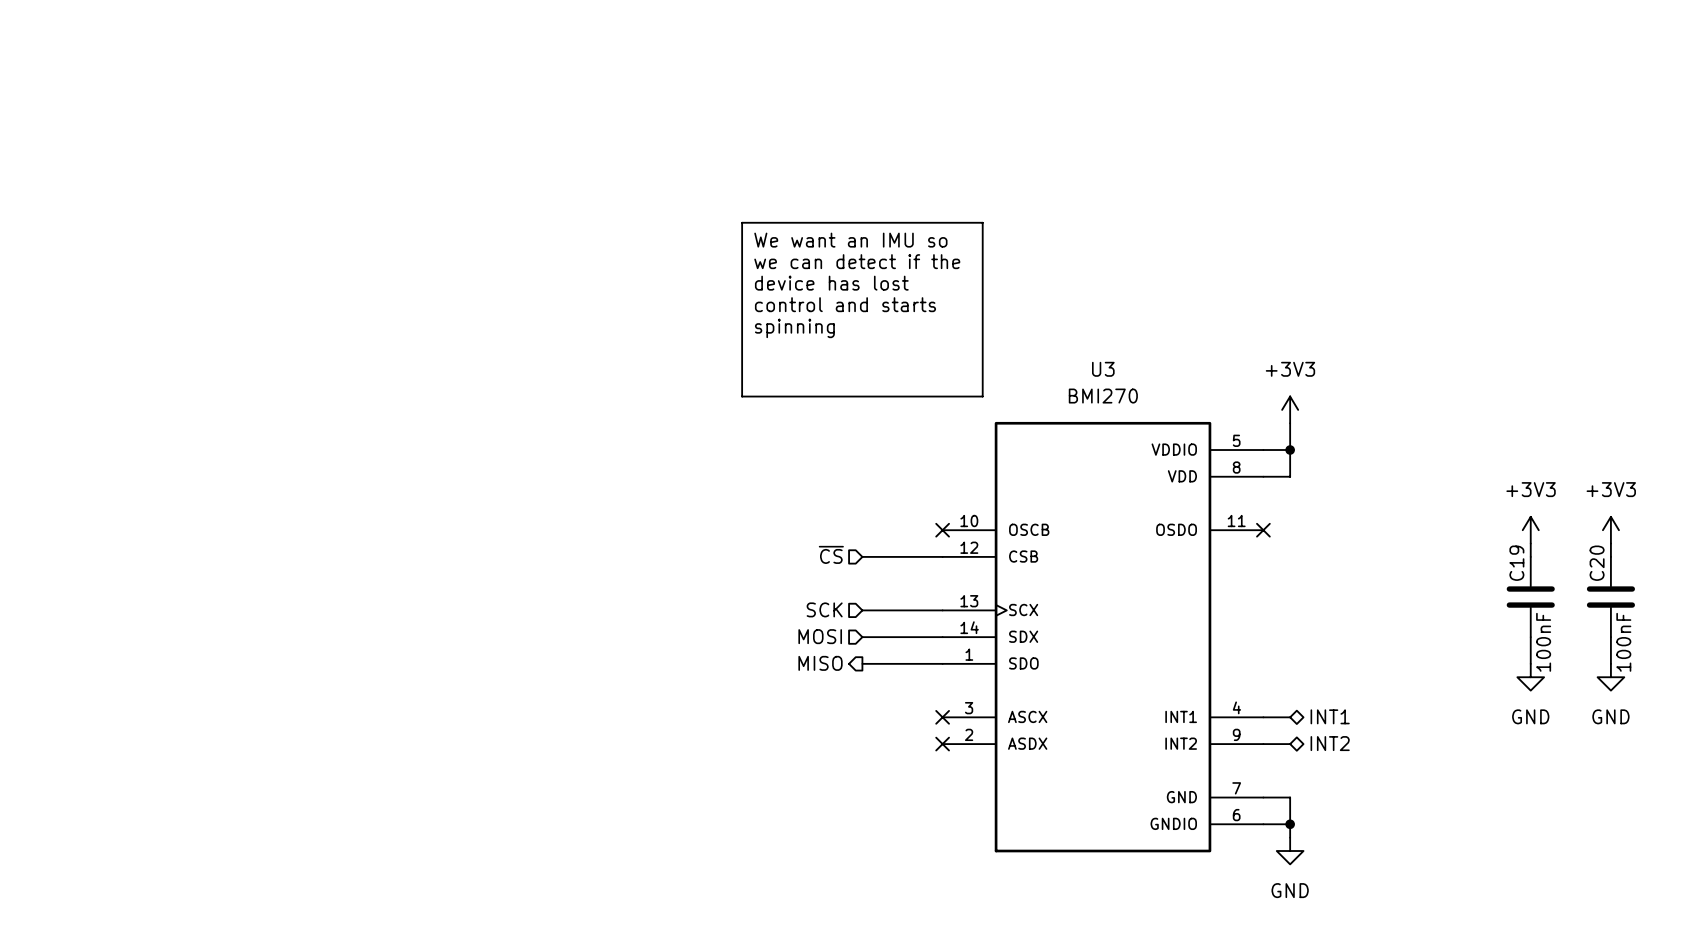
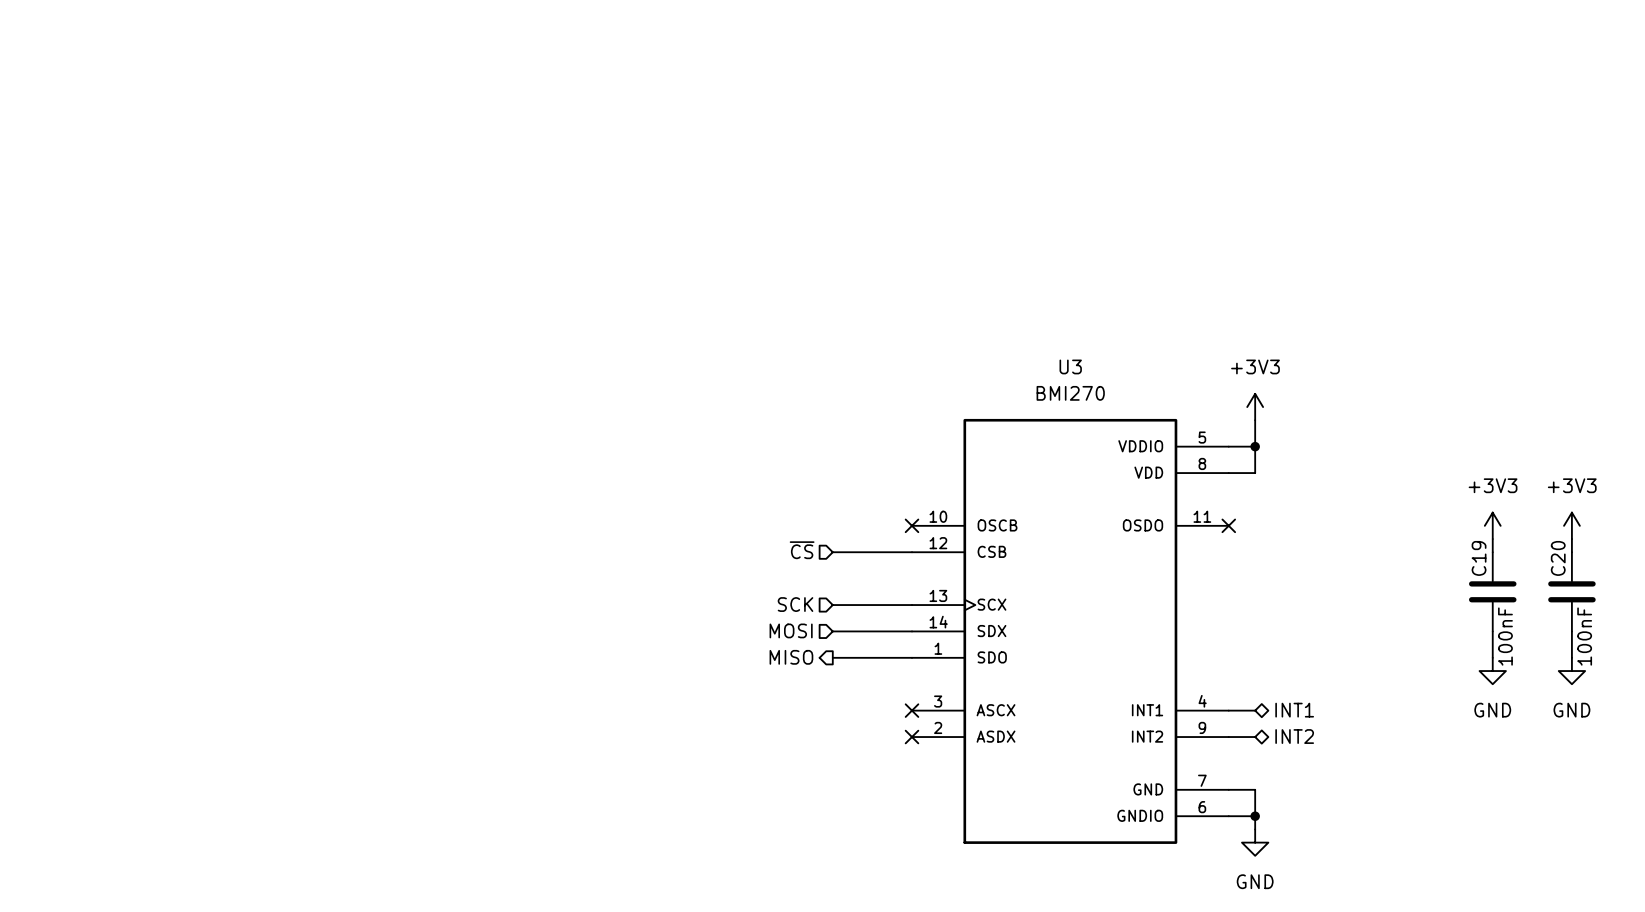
line: (742, 222) (982, 222) (982, 396) (742, 396) (742, 222) -> none
text: We want an IMU so (850, 240) -> none
text: we can detect if the (857, 261) -> none
text: device has lost (831, 283) -> none
text: control and starts (845, 304) -> none
text: spinning (794, 328) -> none

